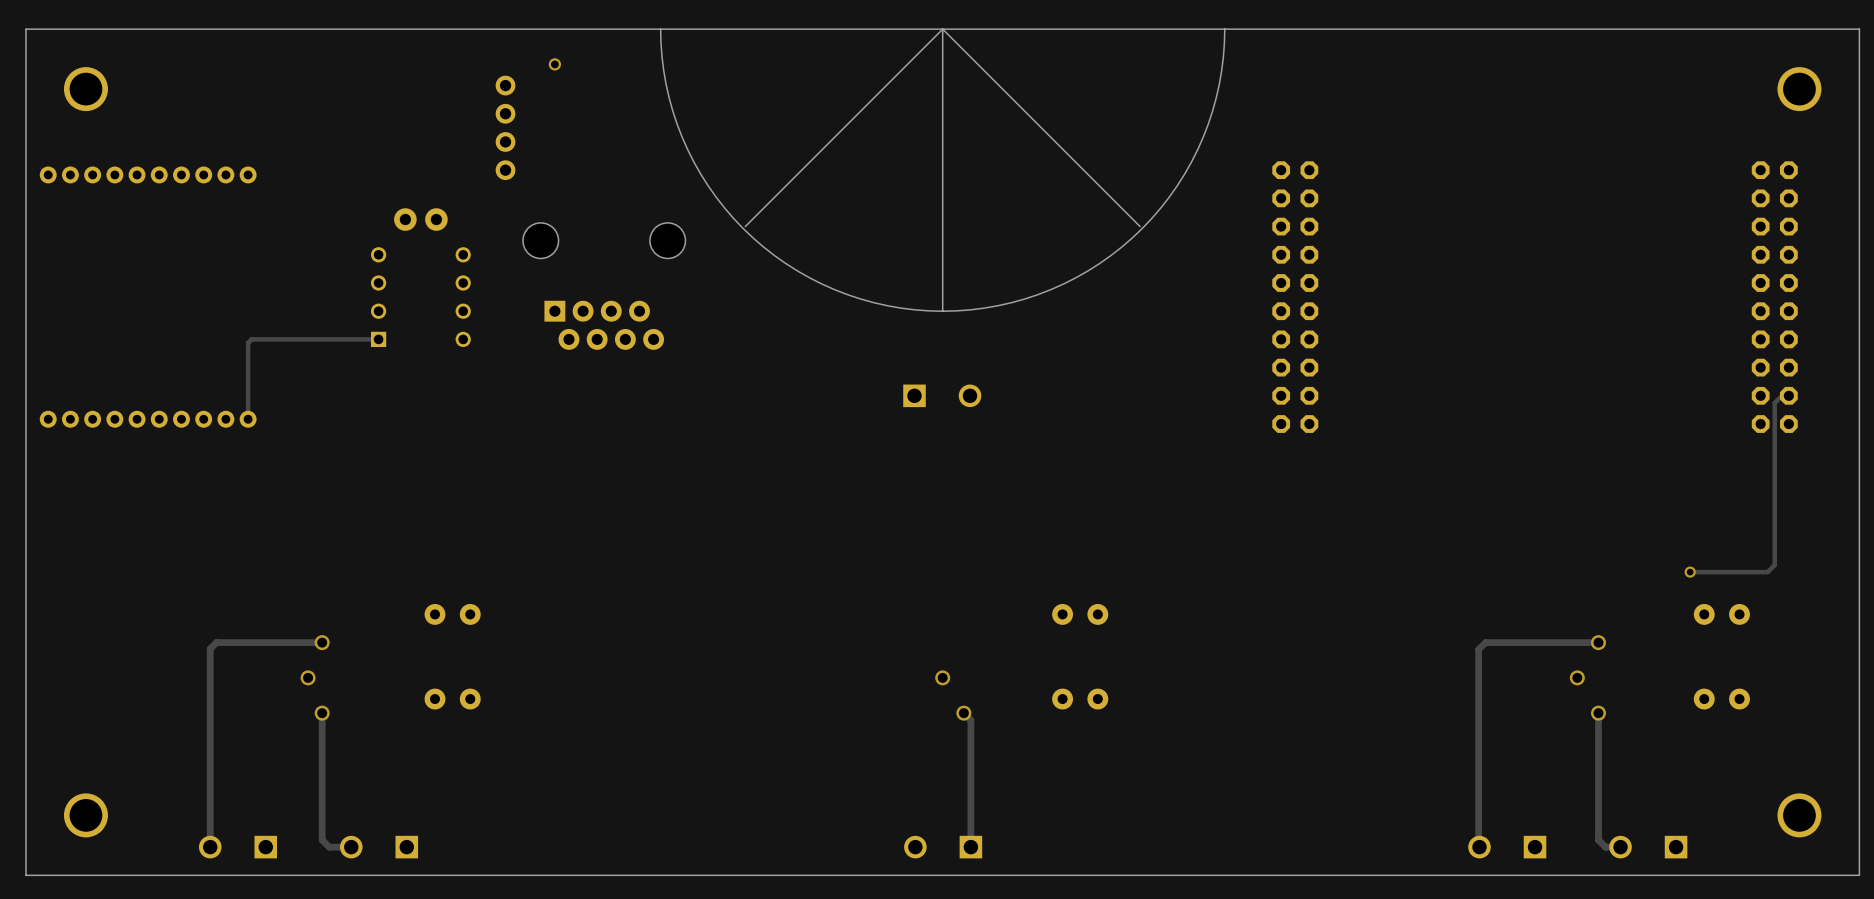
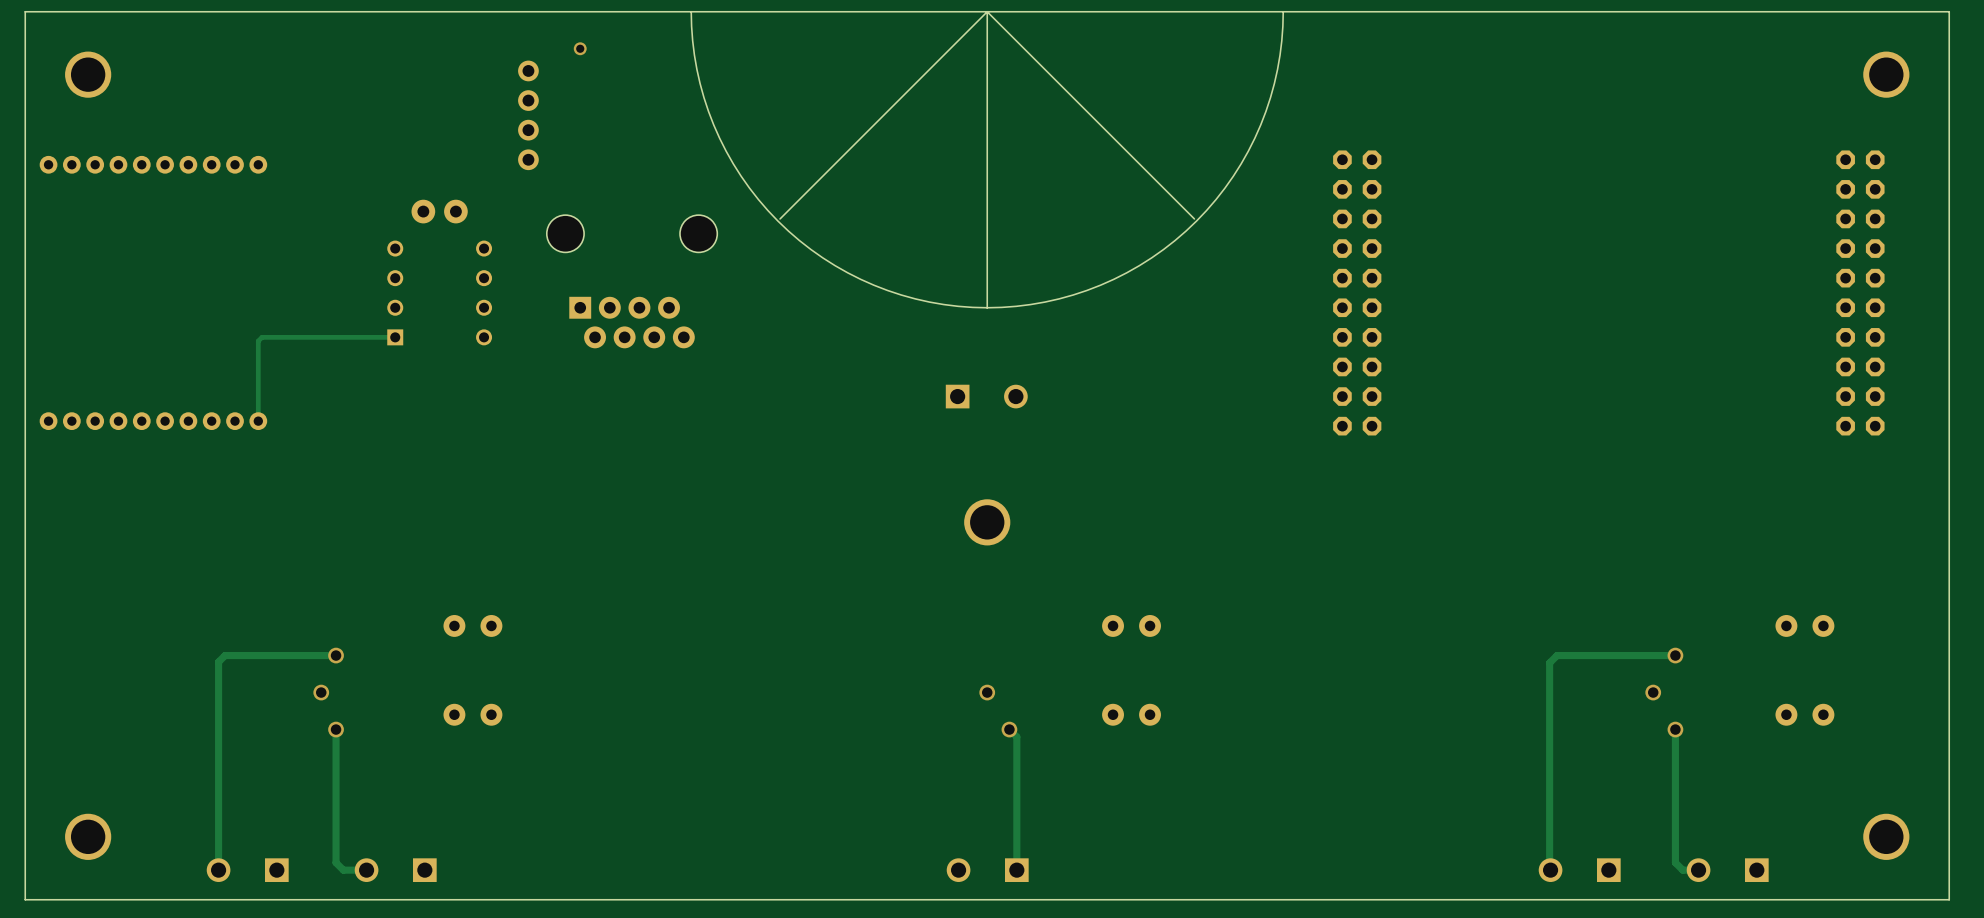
track: (1788, 395) (1781, 395) (1774, 402) (1774, 565) (1767, 572) (1690, 572) -> none
part: none -> (987, 522)
via: (1690, 572) -> none

